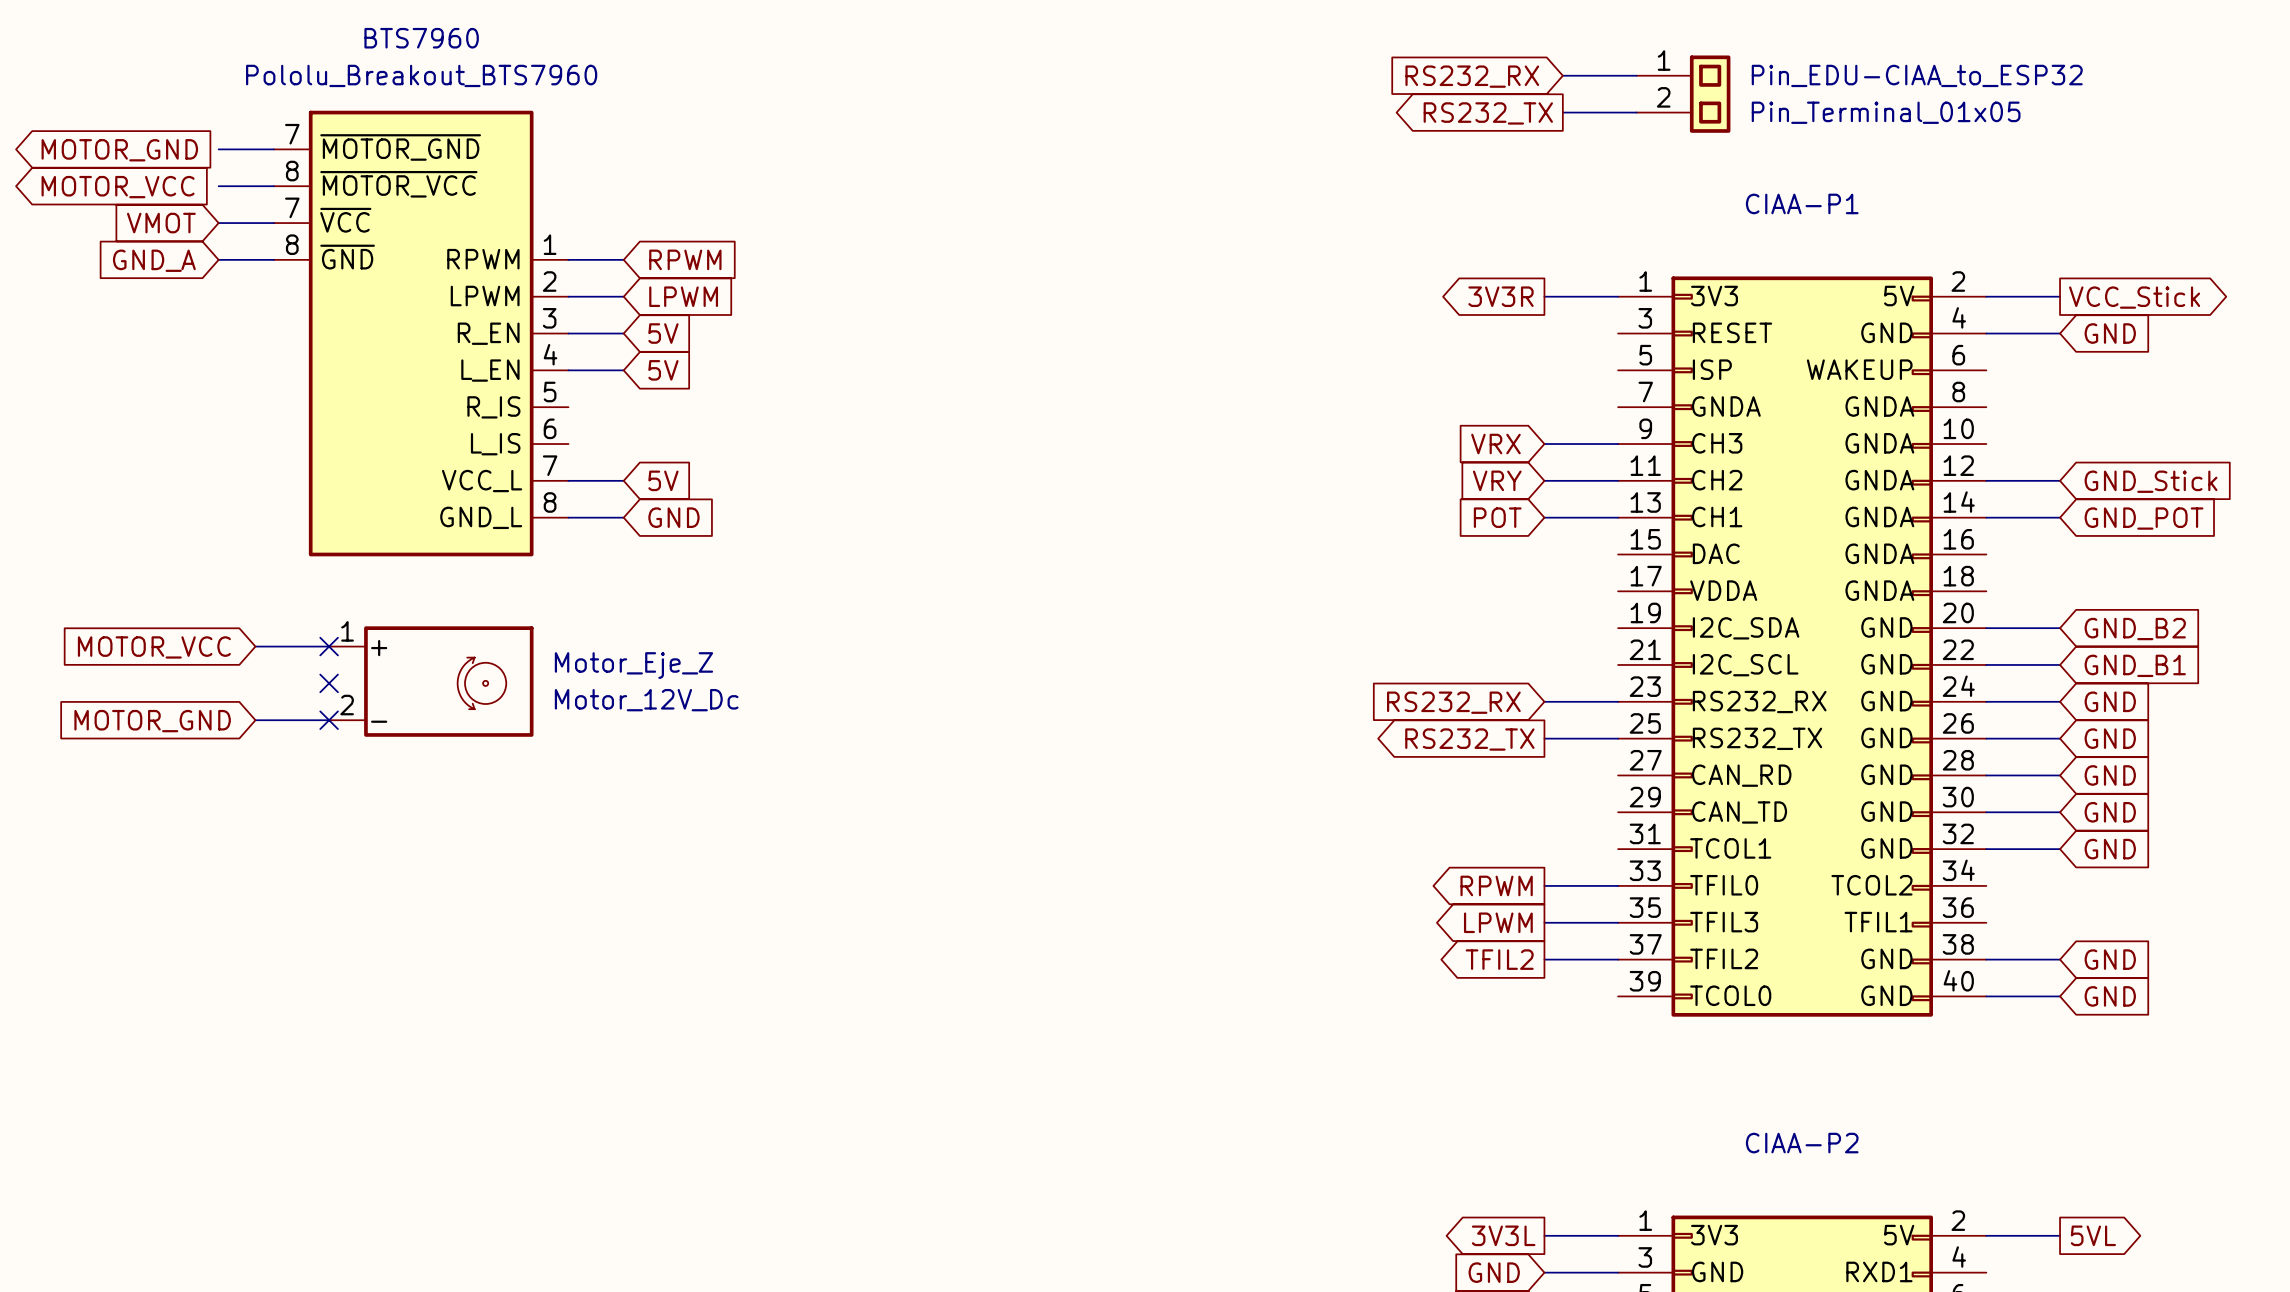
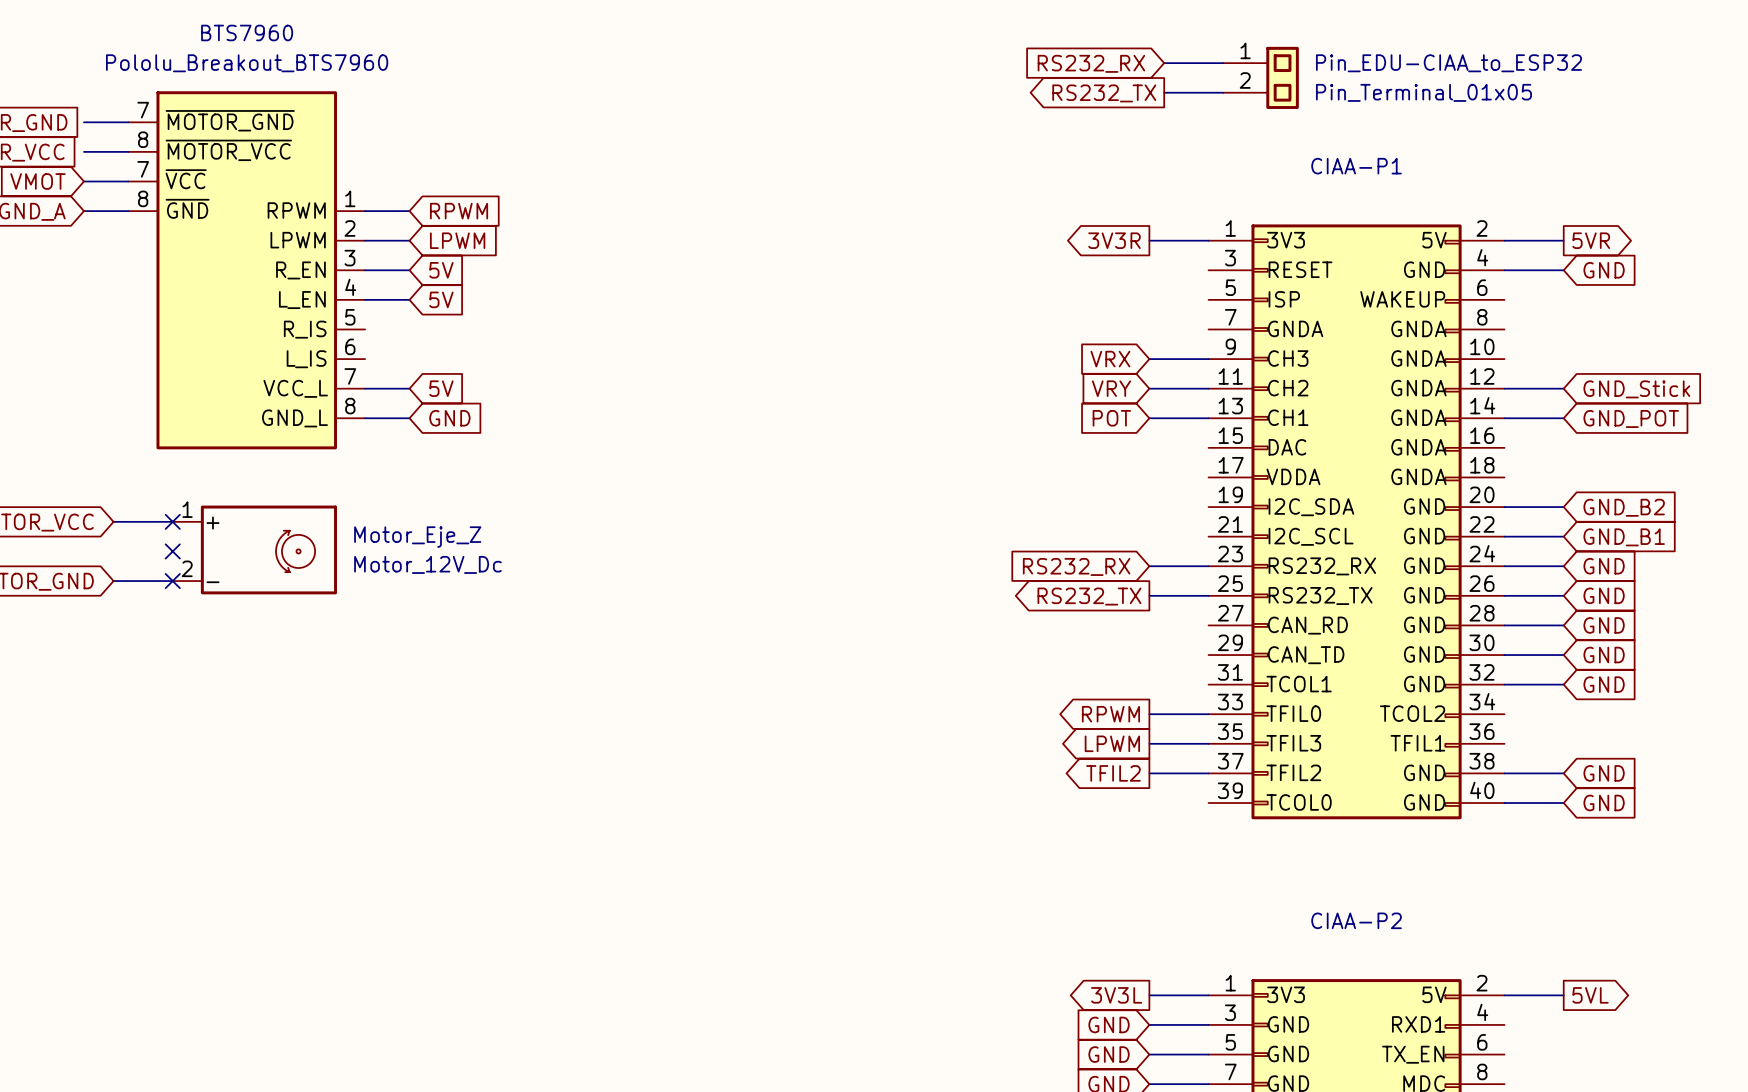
global label: VCC_Stick (2134, 297) -> 5VR (1591, 240)

